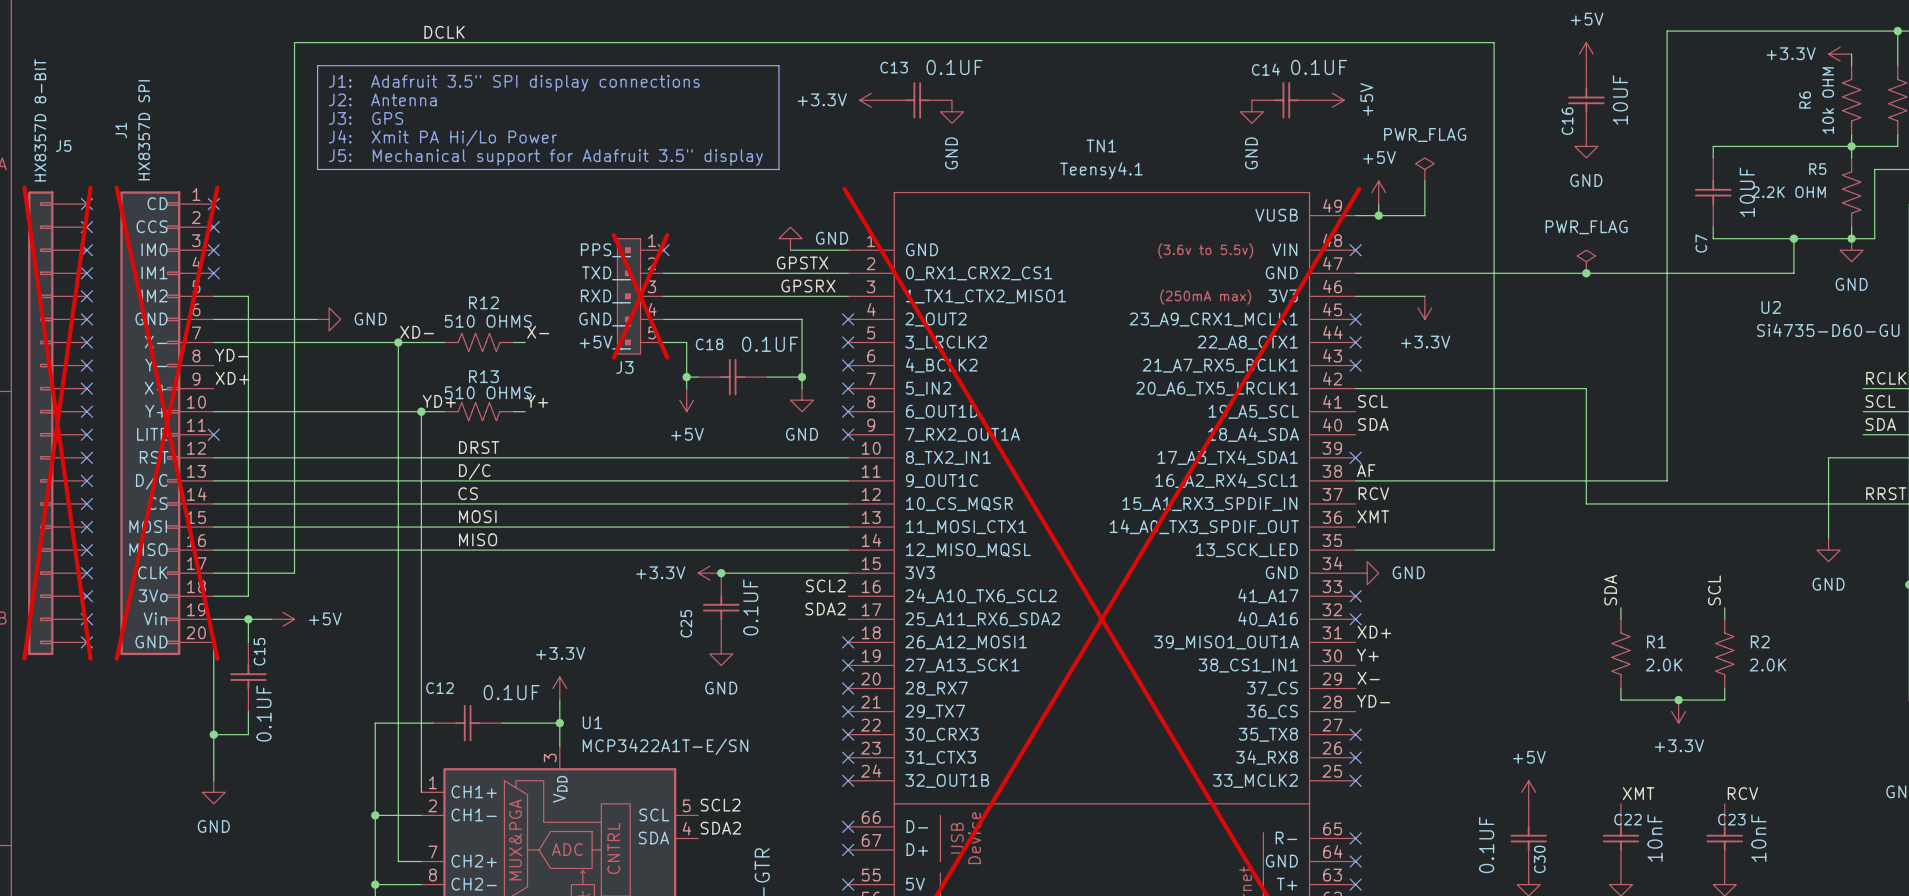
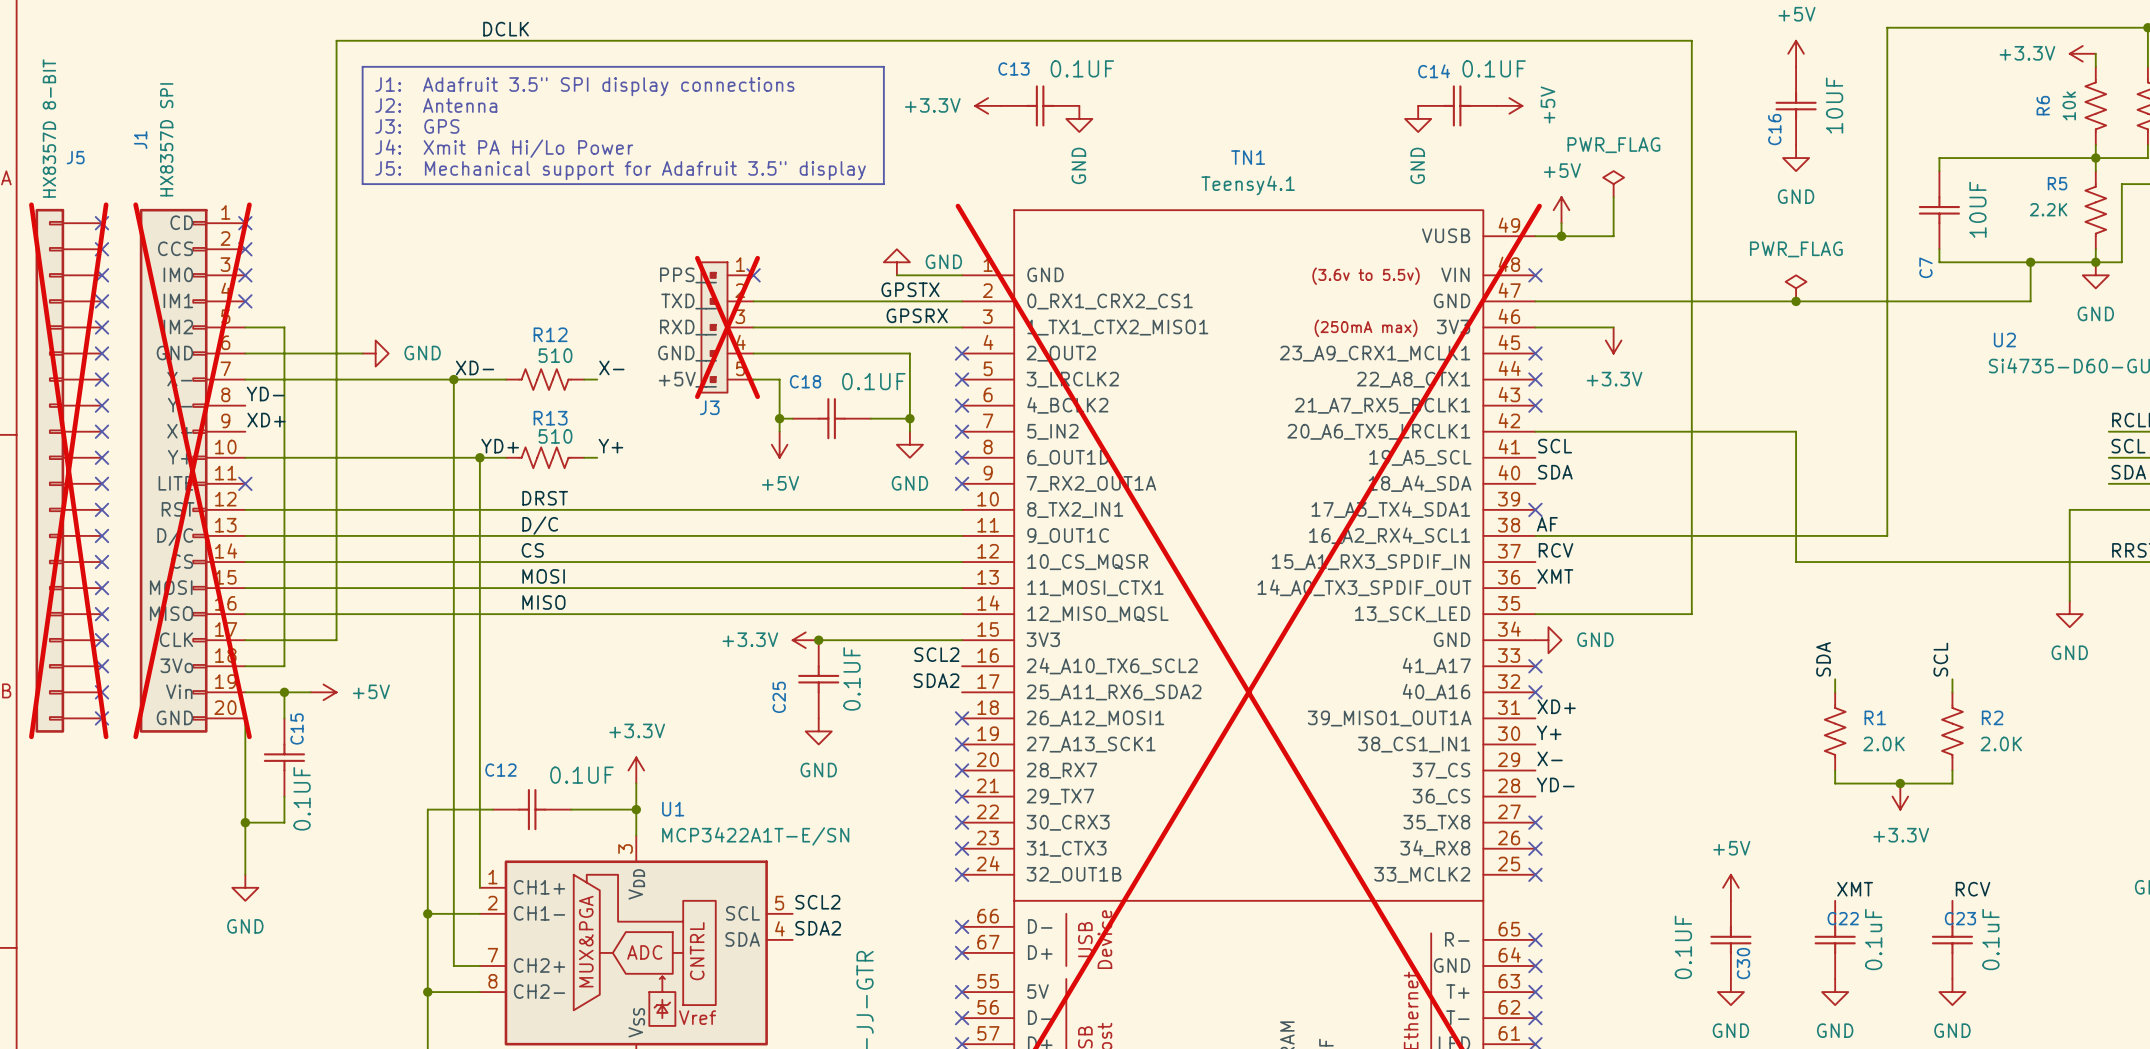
R6 value: 10k OHM (1828, 100) -> 10k (2069, 105)
R5 value: 2.2K OHM (1788, 192) -> 2.2K (2048, 209)
R12 value: 510 OHMS (488, 321) -> 510 (555, 355)
R13 value: 510 OHMS (488, 392) -> 510 (555, 436)
C22 value: 10nF (1655, 838) -> 0.1uF (1873, 939)
C23 value: 10nF (1758, 838) -> 0.1uF (1990, 939)

